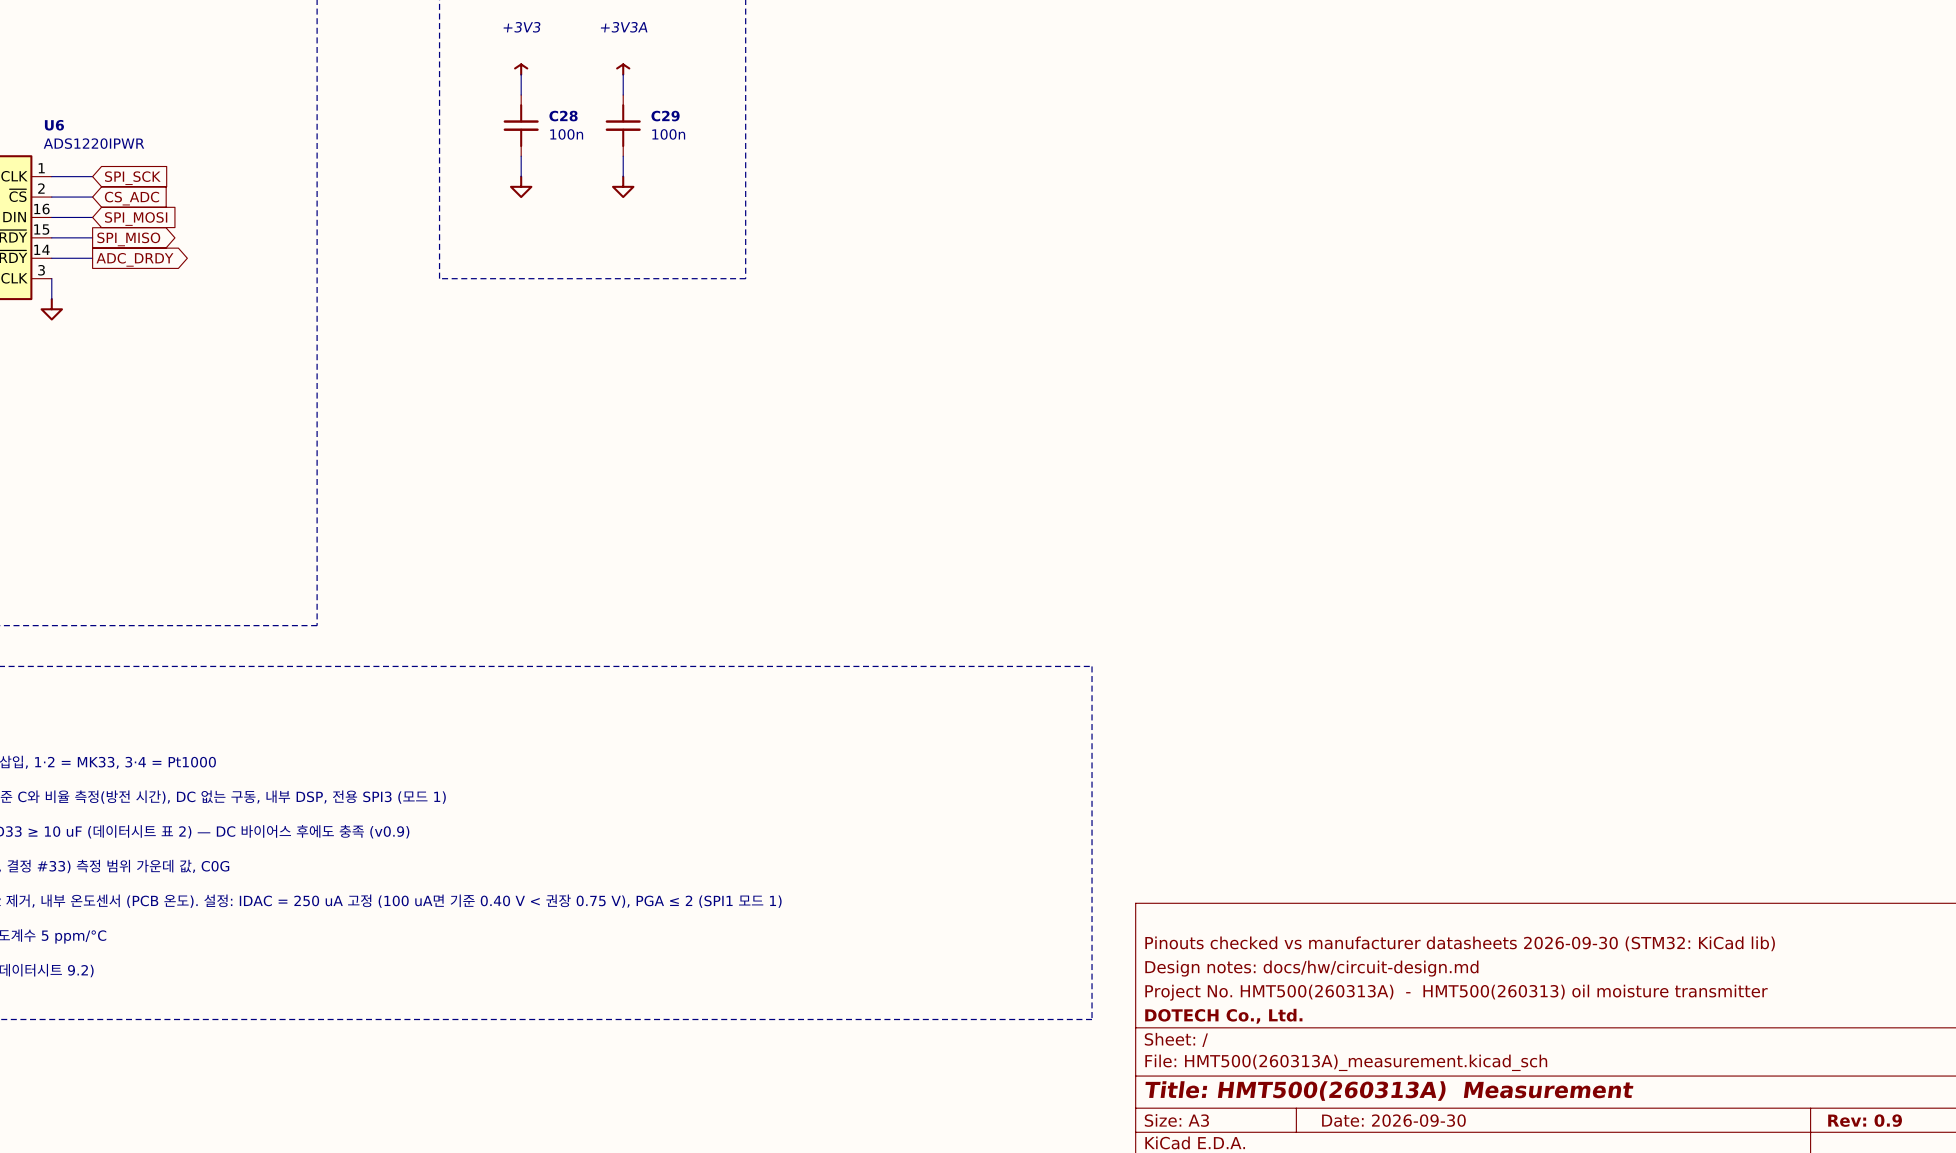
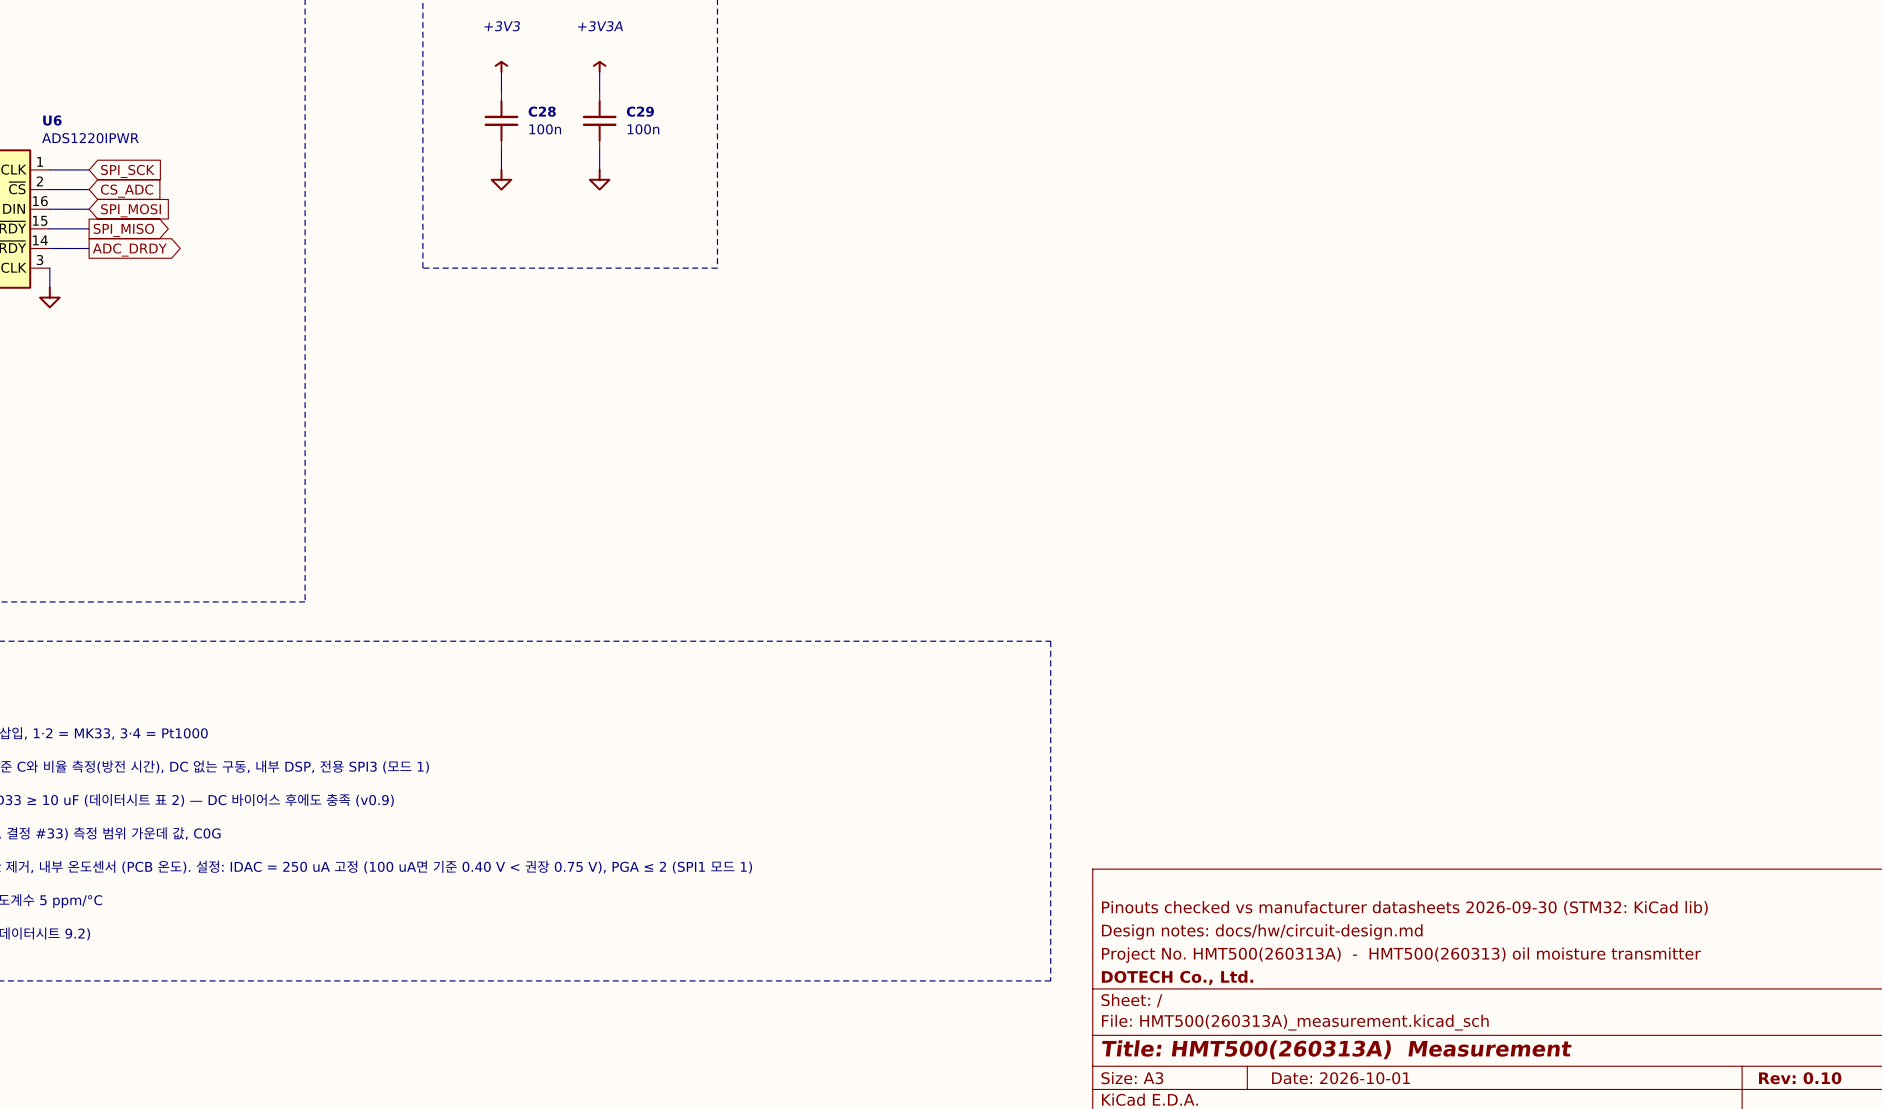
title block: Date: 2026-09-30 (1393, 1120) -> Date: 2026-10-01 (1341, 1078)
title block: Rev: 0.9 (1865, 1120) -> Rev: 0.10 (1800, 1078)

